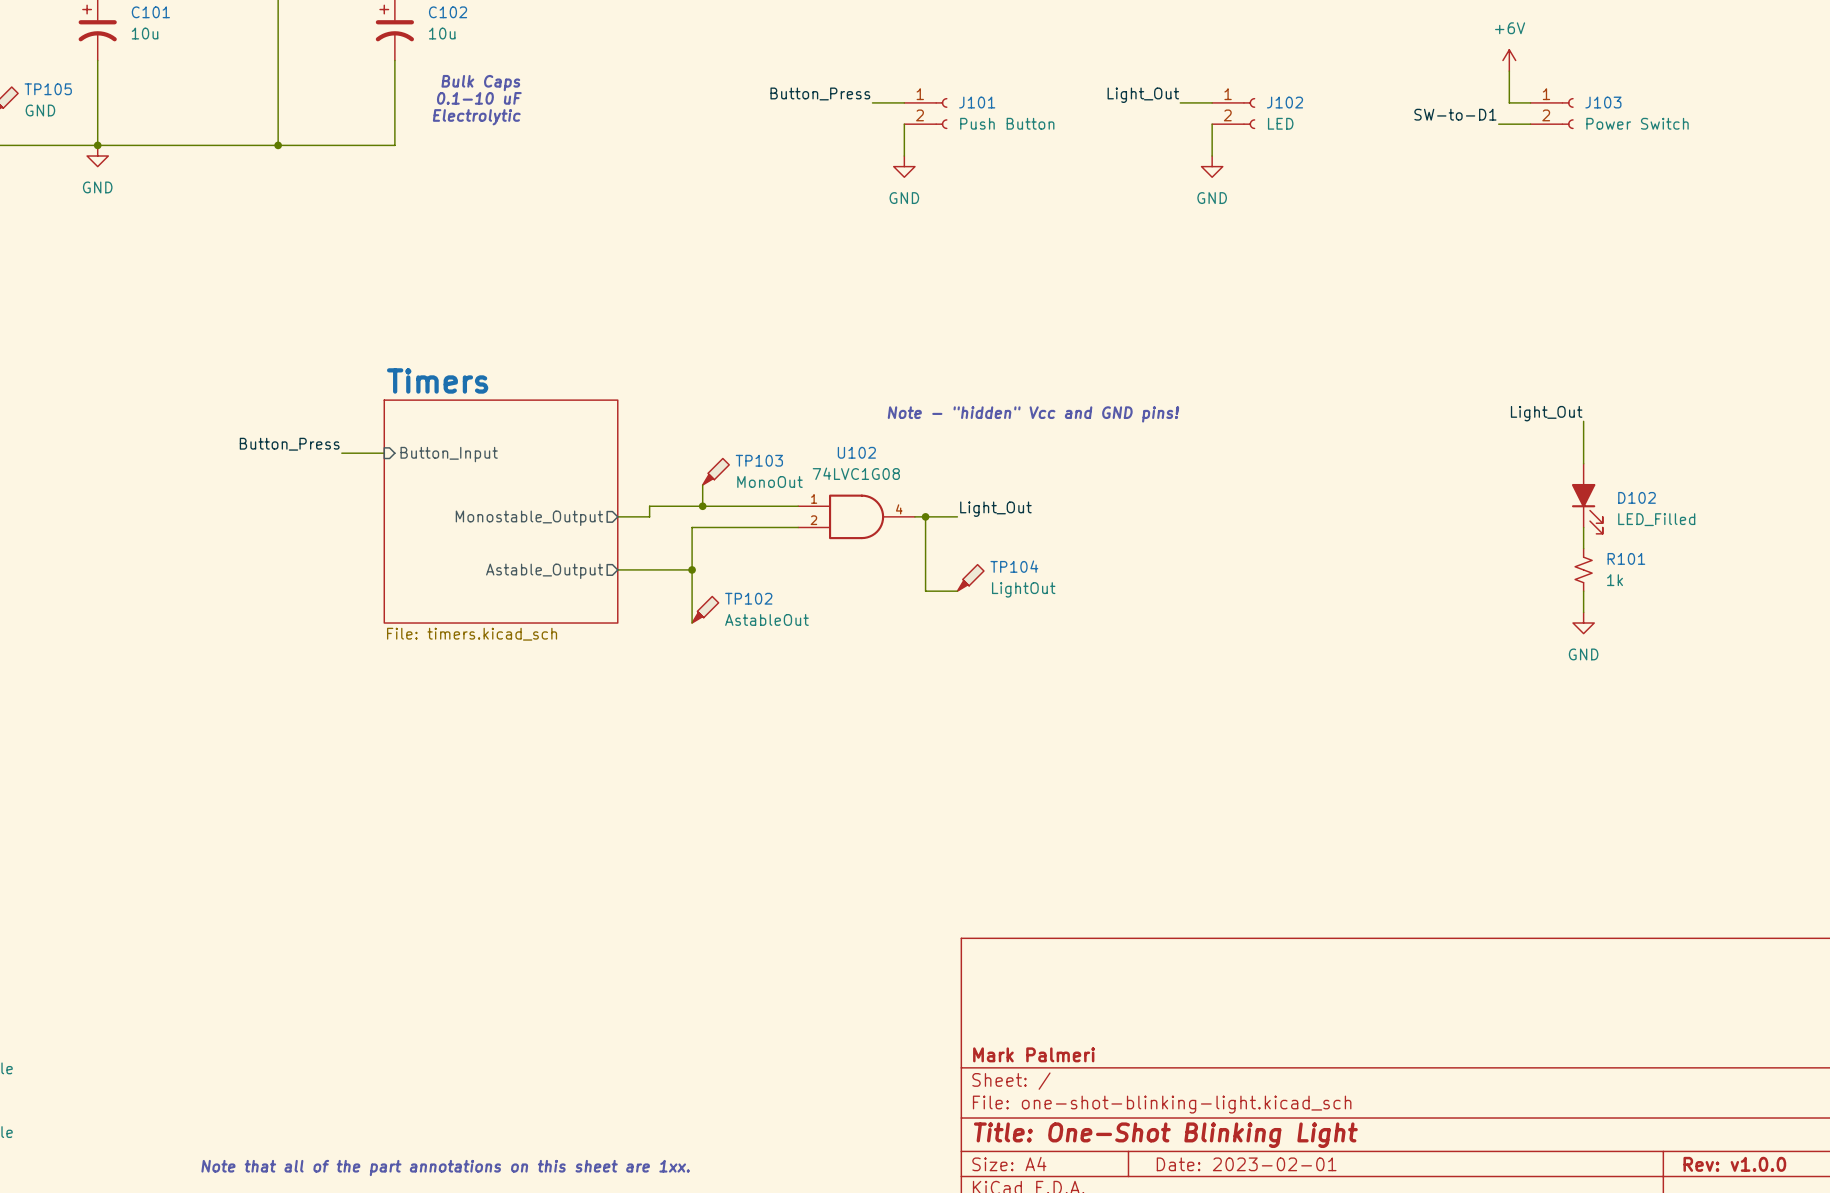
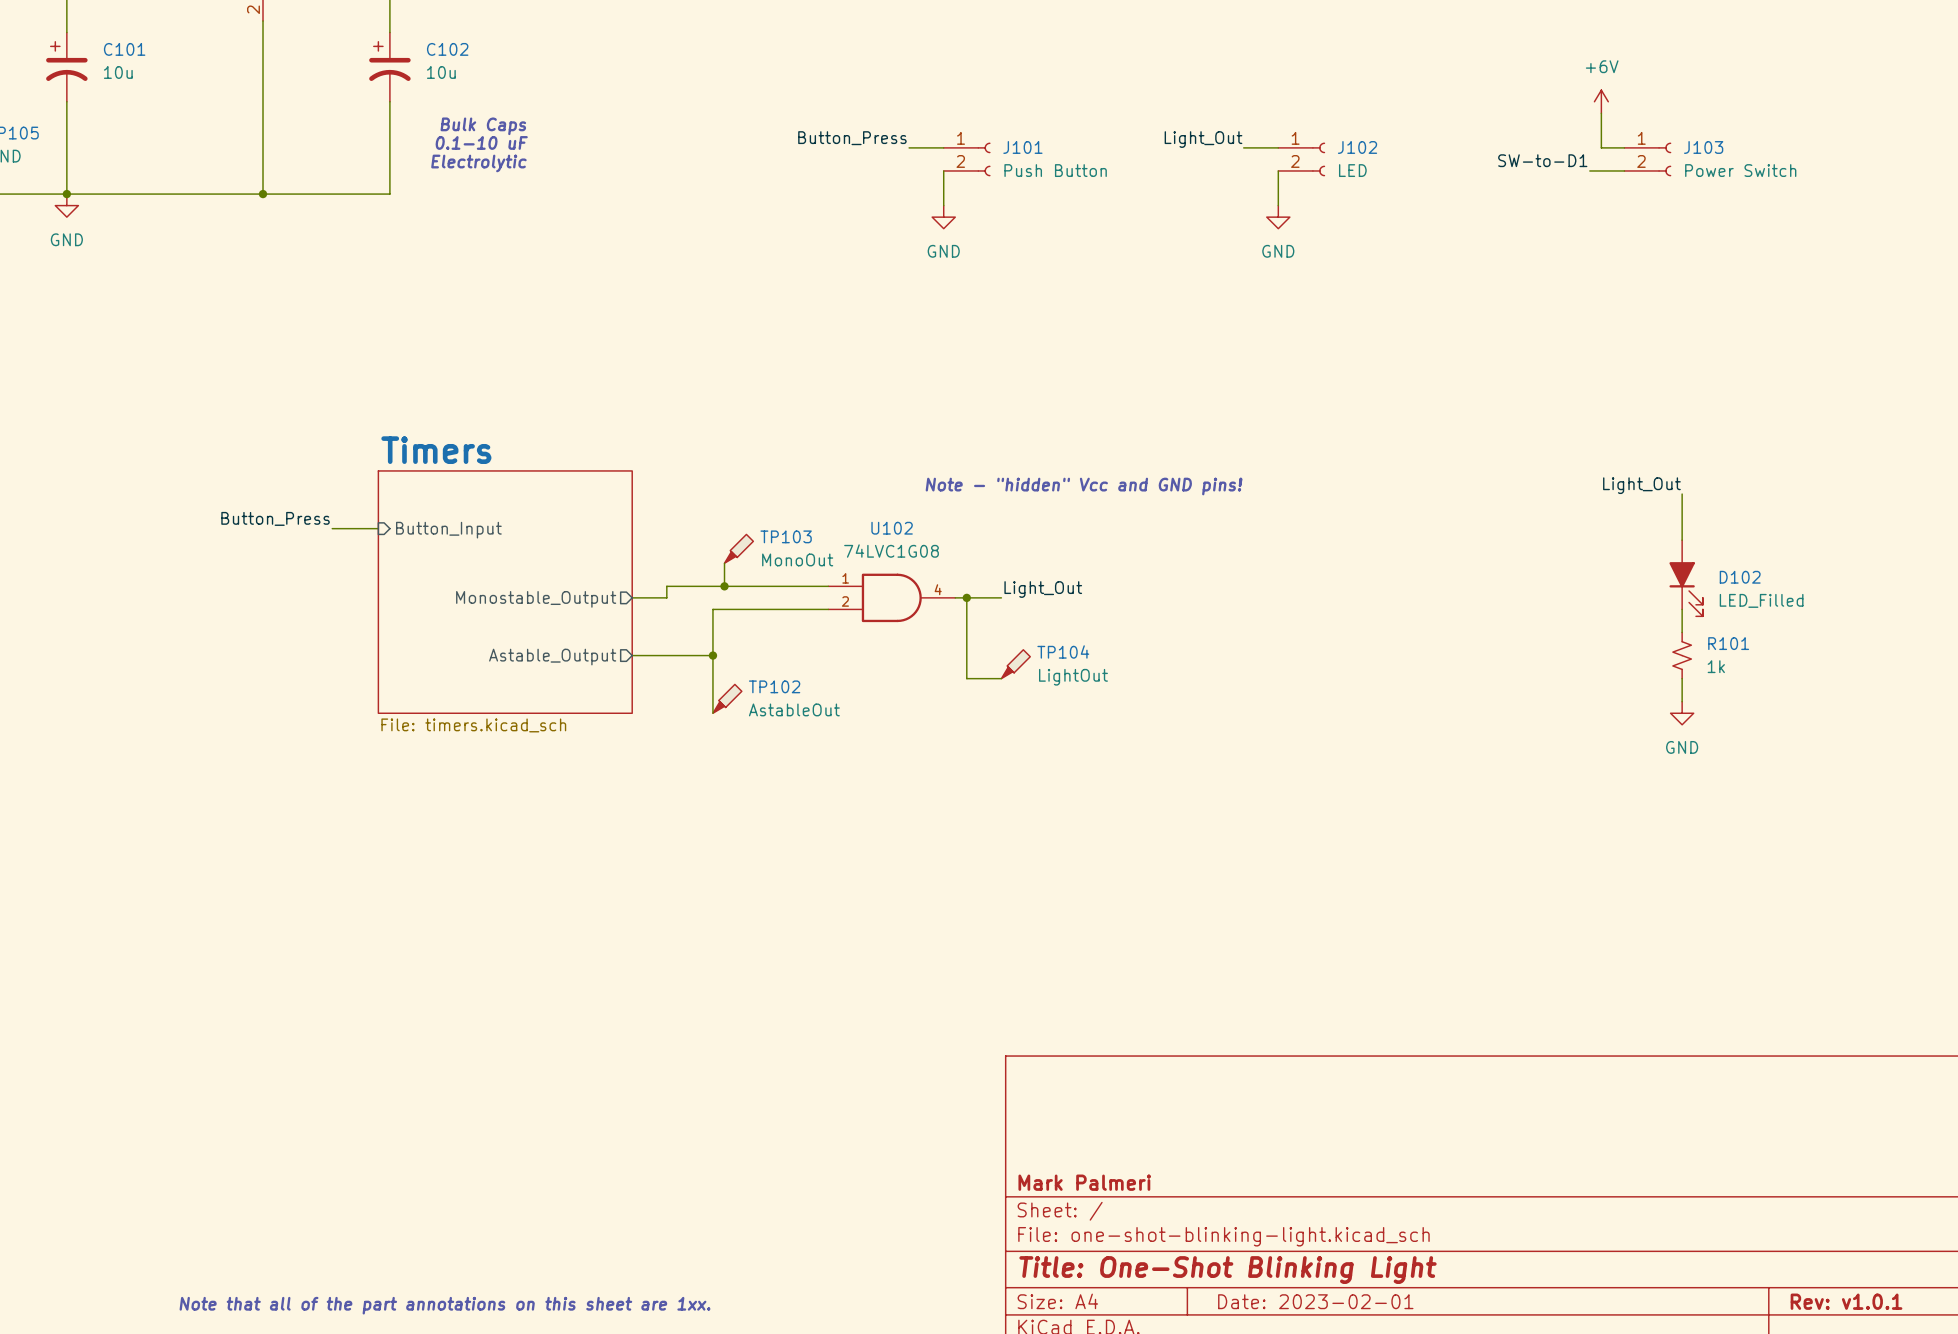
title block: Rev: v1.0.0 (1734, 1164) -> Rev: v1.0.1 (1846, 1301)

